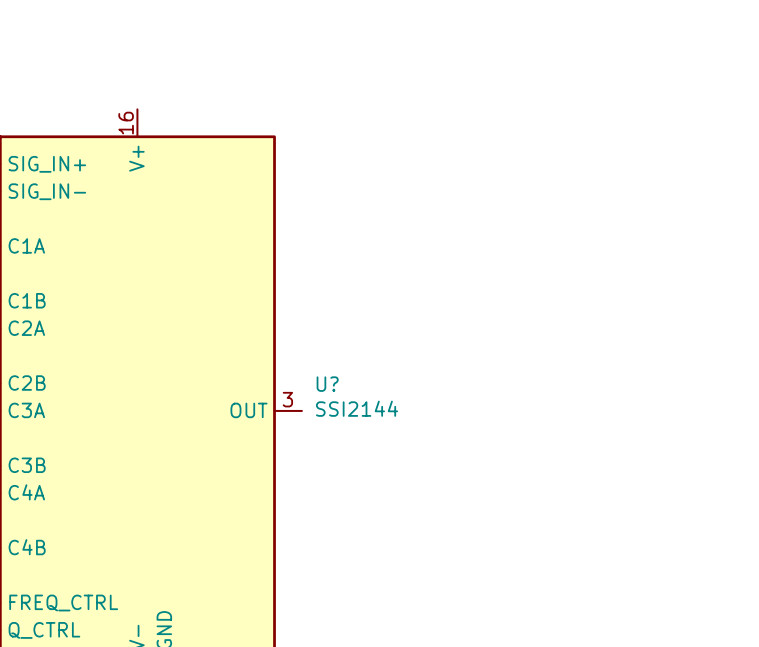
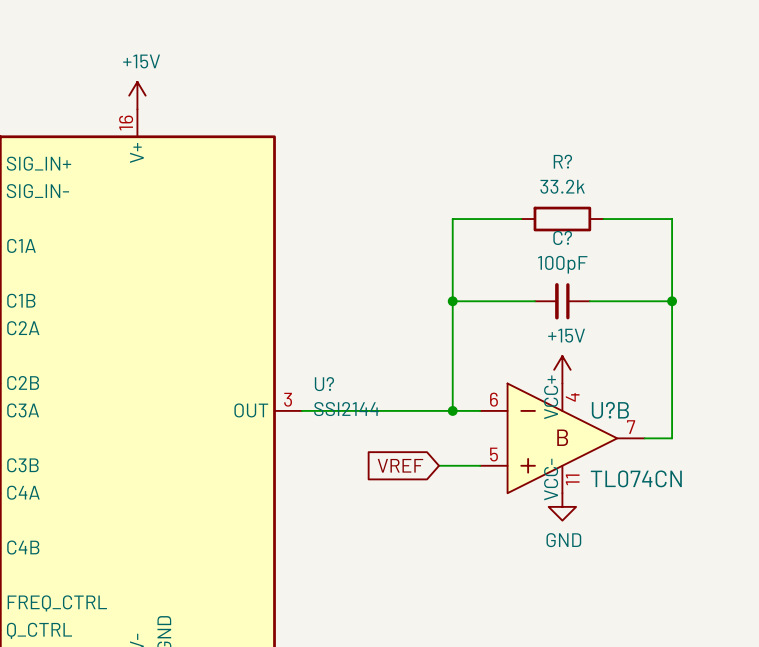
power symbol: none -> +15V (137, 95)
wire: none -> (521, 219) (452, 219) (452, 410)
R?: none -> 33.2k (562, 219)
wire: none -> (603, 219) (672, 219) (672, 438) (644, 438)
wire: none -> (452, 301) (534, 301)
junction: none -> (452, 301)
C?: none -> 100pF (562, 301)
wire: none -> (589, 301) (672, 301)
junction: none -> (672, 301)
power symbol: none -> +15V (562, 369)
wire: none -> (301, 410) (480, 410)
junction: none -> (452, 410)
U?B: none -> TL074CN (562, 438)
global label: none -> VREF (400, 465)
wire: none -> (439, 465) (480, 465)
power symbol: none -> GND (562, 506)

